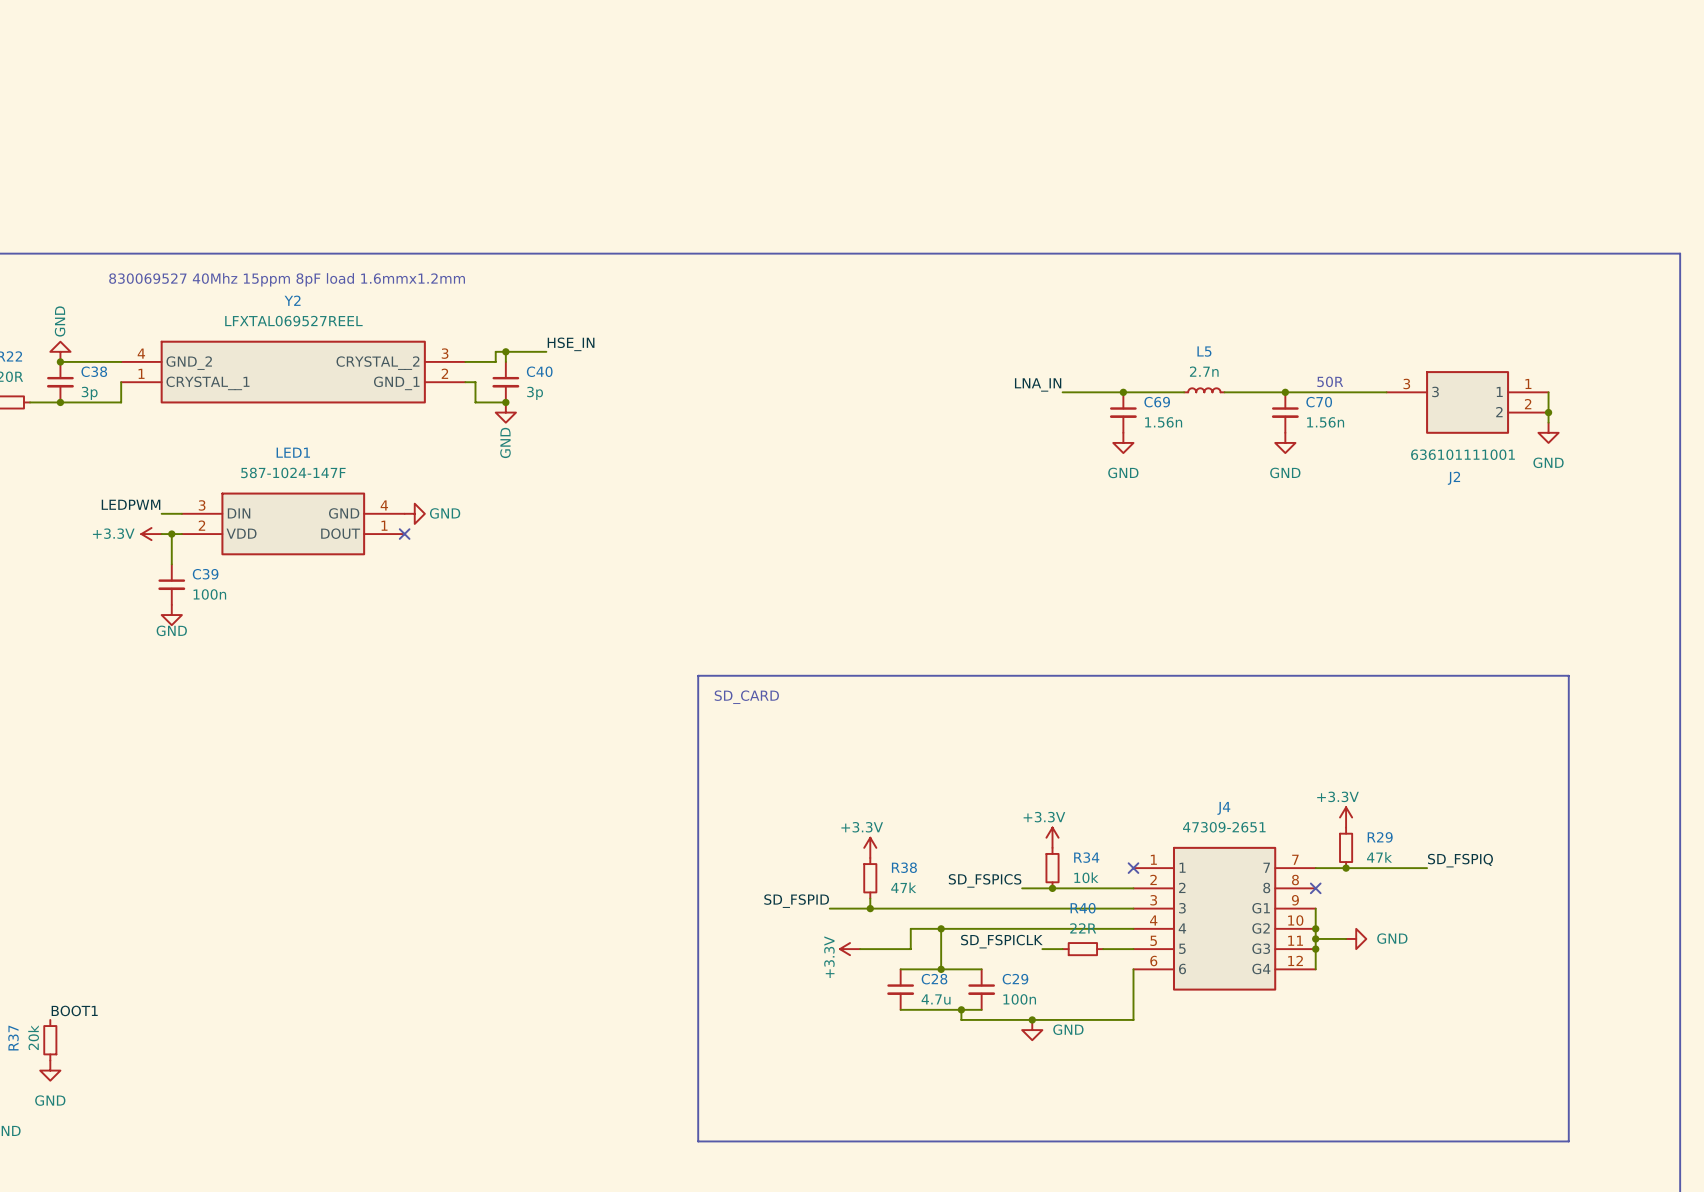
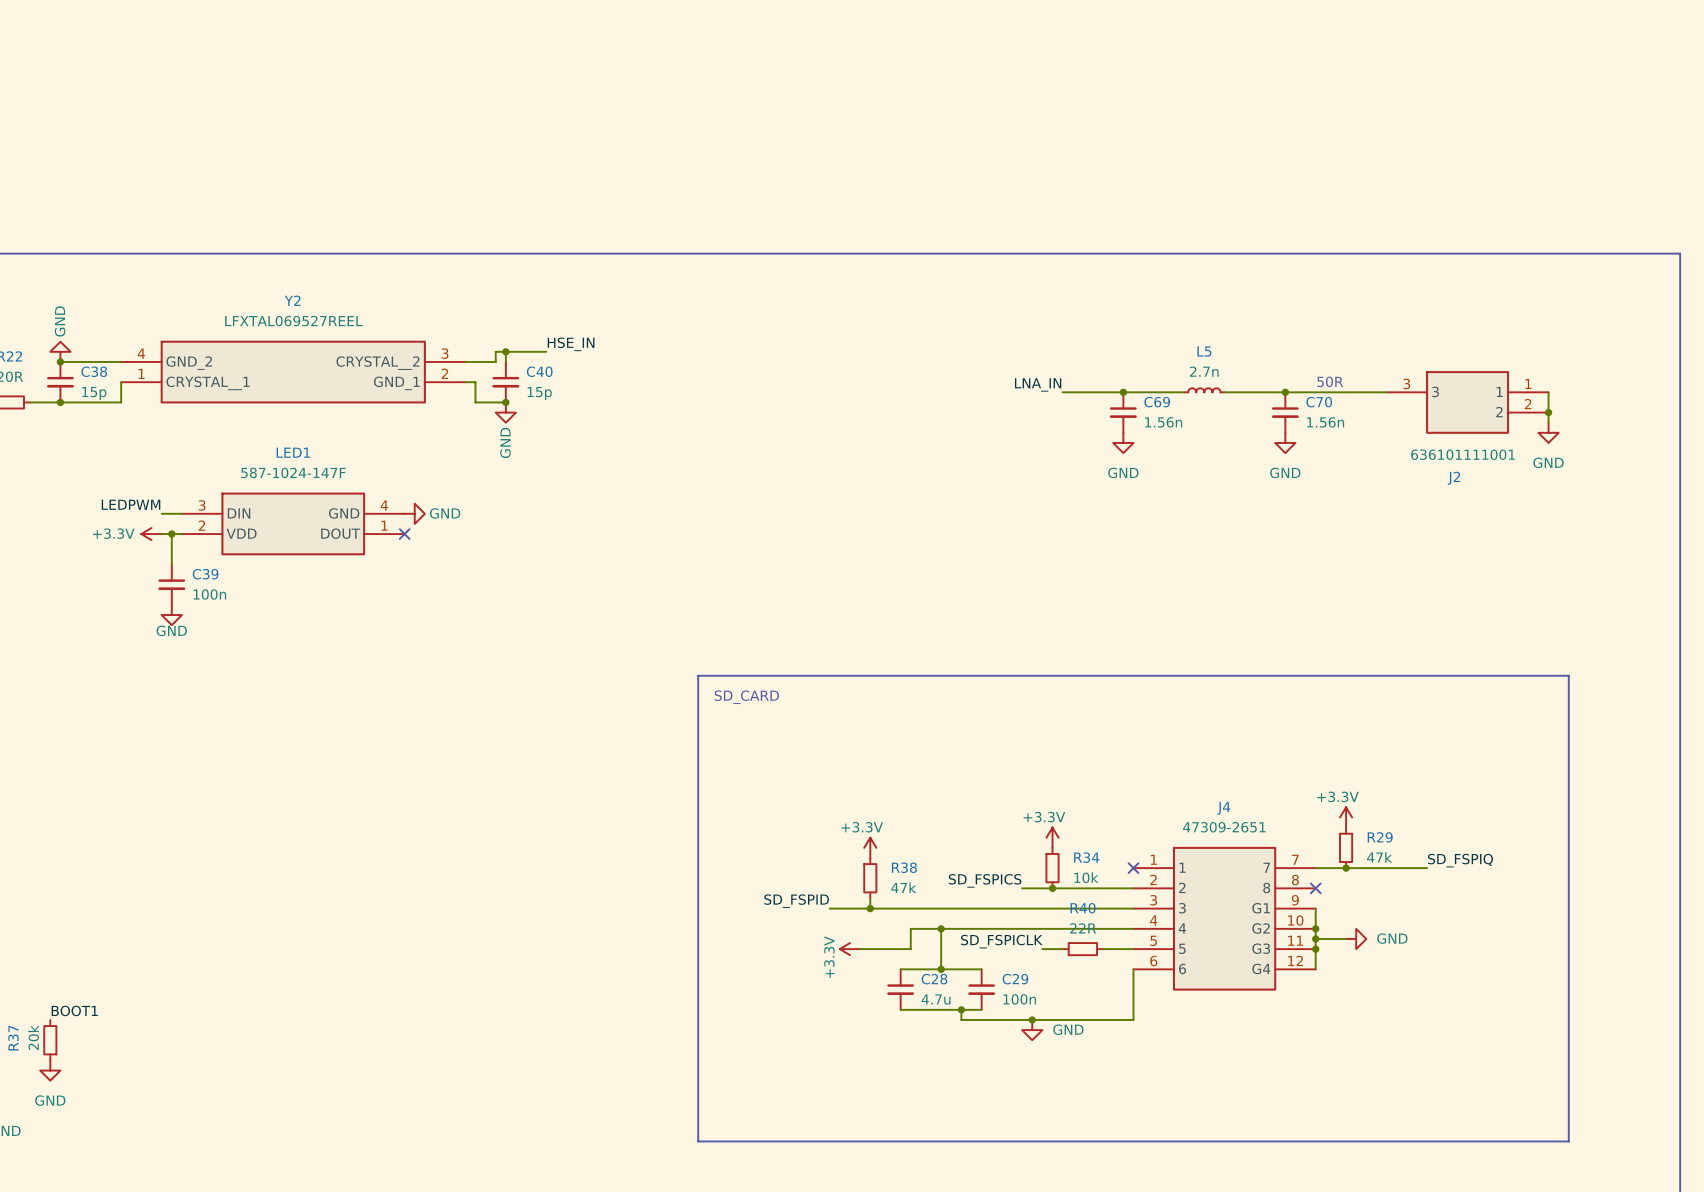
text: 830069527 40Mhz 15ppm 8pF load 1.6mmx1.2mm (287, 279) -> none
C38 value: 3p (89, 393) -> 15p (94, 393)
C40 value: 3p (535, 393) -> 15p (539, 393)

